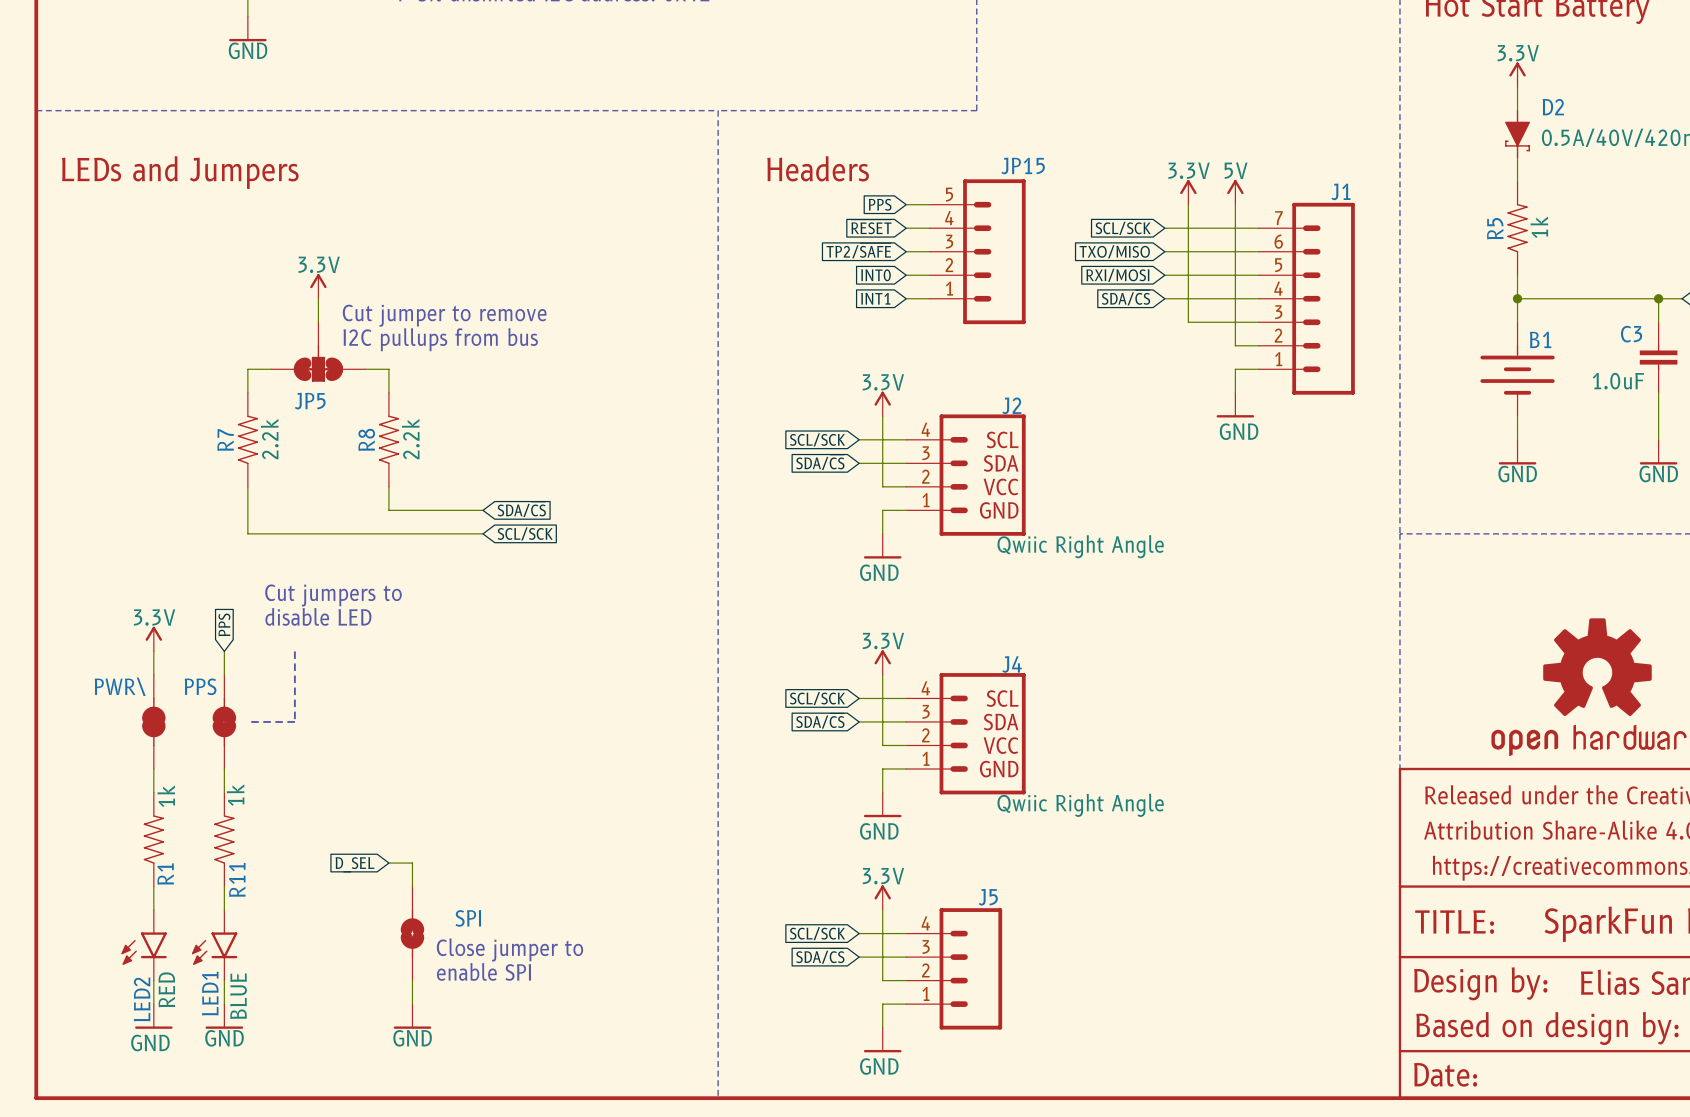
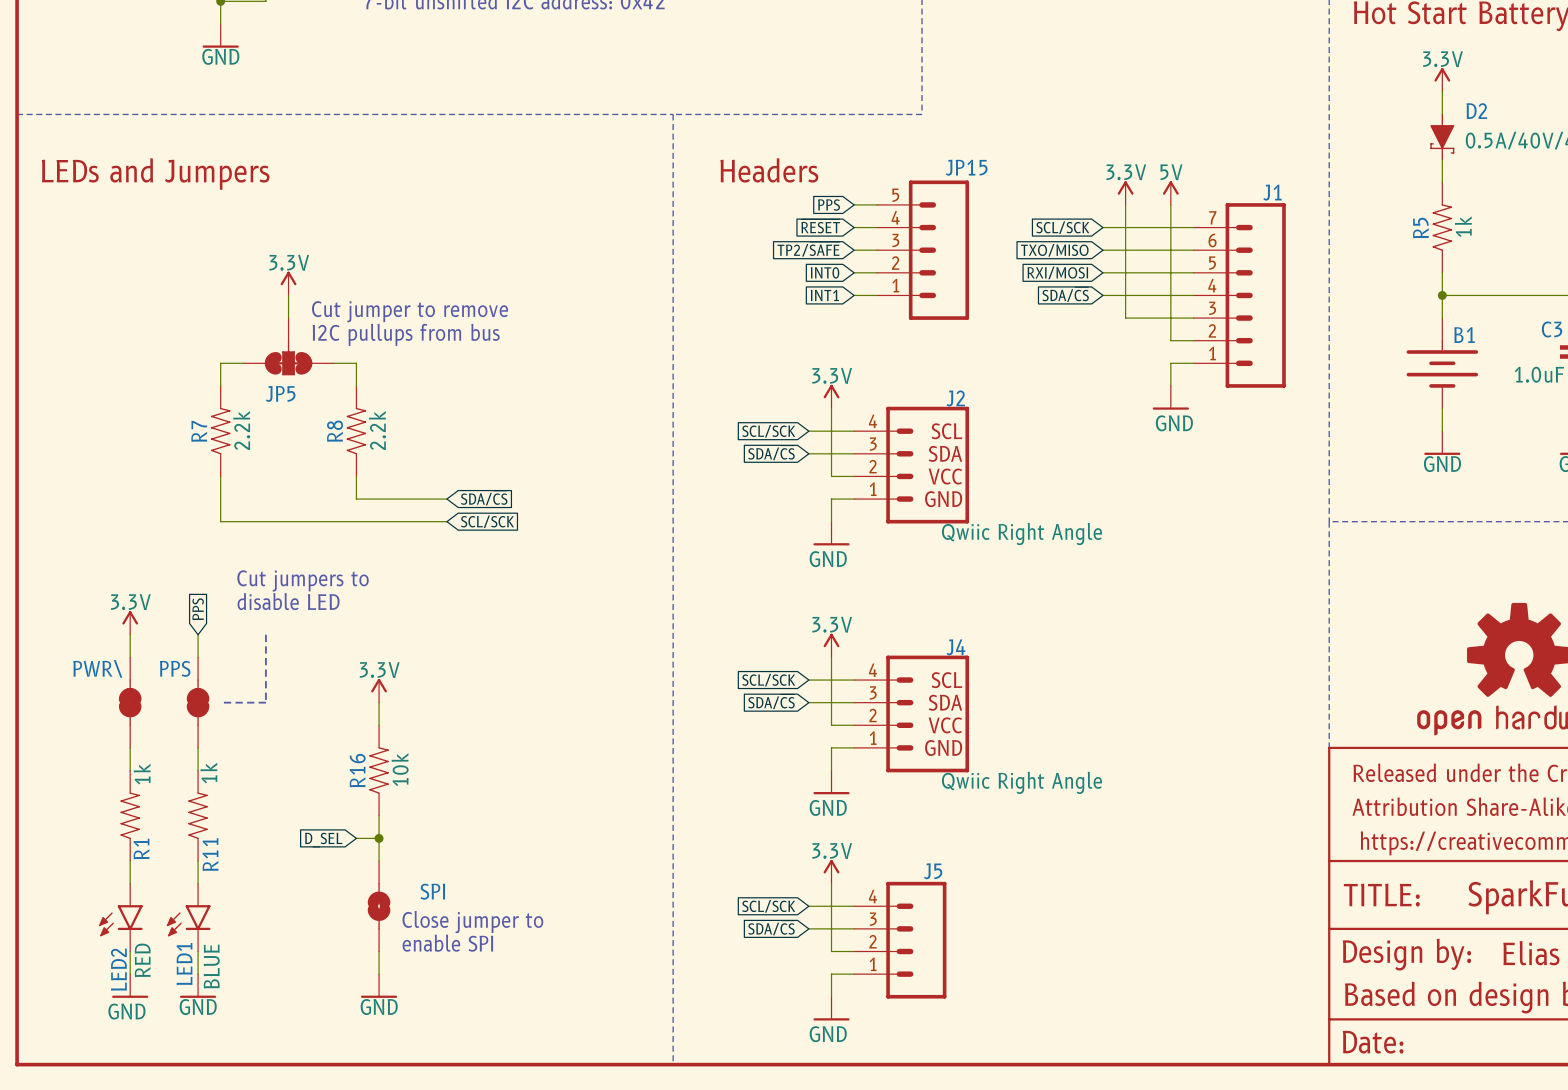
power symbol: none -> 3.3V (379, 690)
wire: none -> (379, 702) (379, 725)
R16: none -> 10k (379, 770)
wire: none -> (379, 815) (379, 838)
junction: none -> (379, 838)

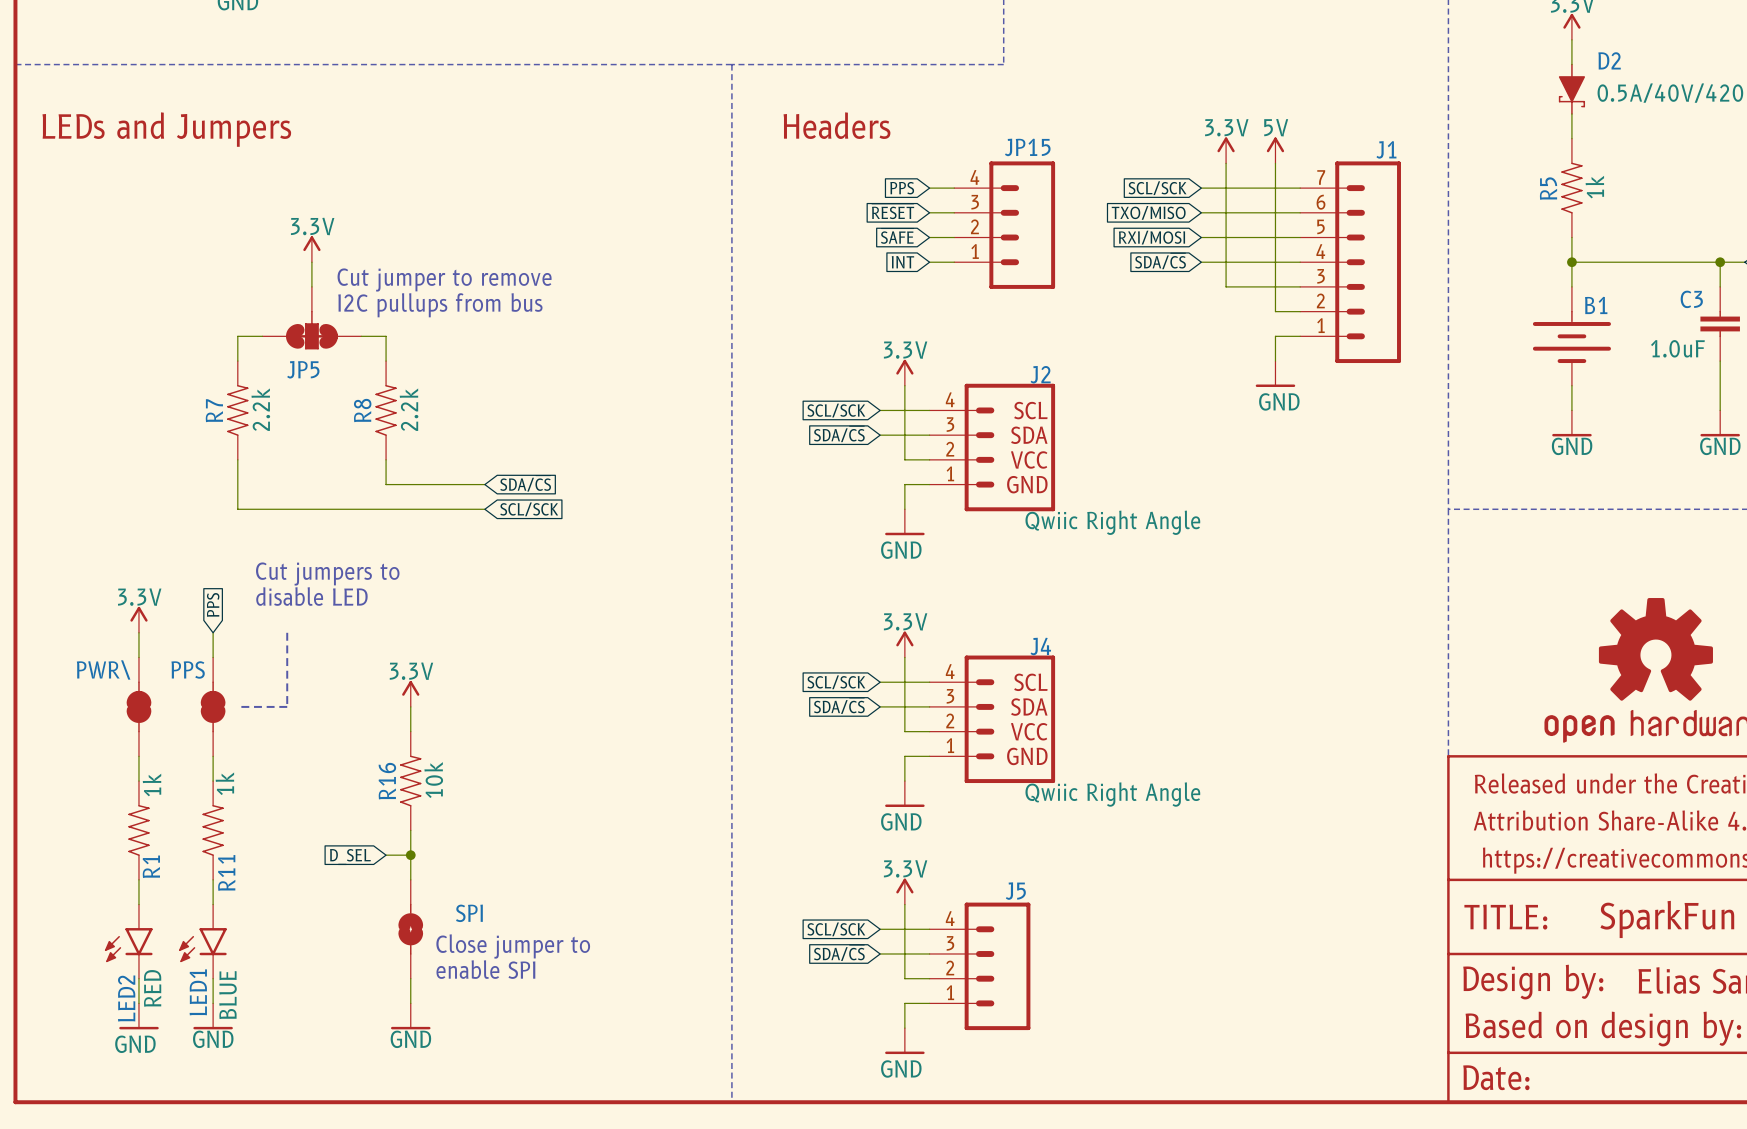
JP15 name position: JP15 (966, 167) -> JP15 (1027, 147)
JP15 symbol: [876, 180, 970, 320] -> [954, 161, 1056, 289]
wire: (854, 204) (876, 204) -> none
global label: PPS (829, 205) -> none
global label: ~{RESET} (820, 226) -> PPS (902, 188)
global label: TP2/~{SAFE} (808, 249) -> ~{RESET} (893, 211)
global label: INT0 (825, 272) -> ~{SAFE} (897, 236)
global label: INT1 (824, 295) -> INT (902, 262)

